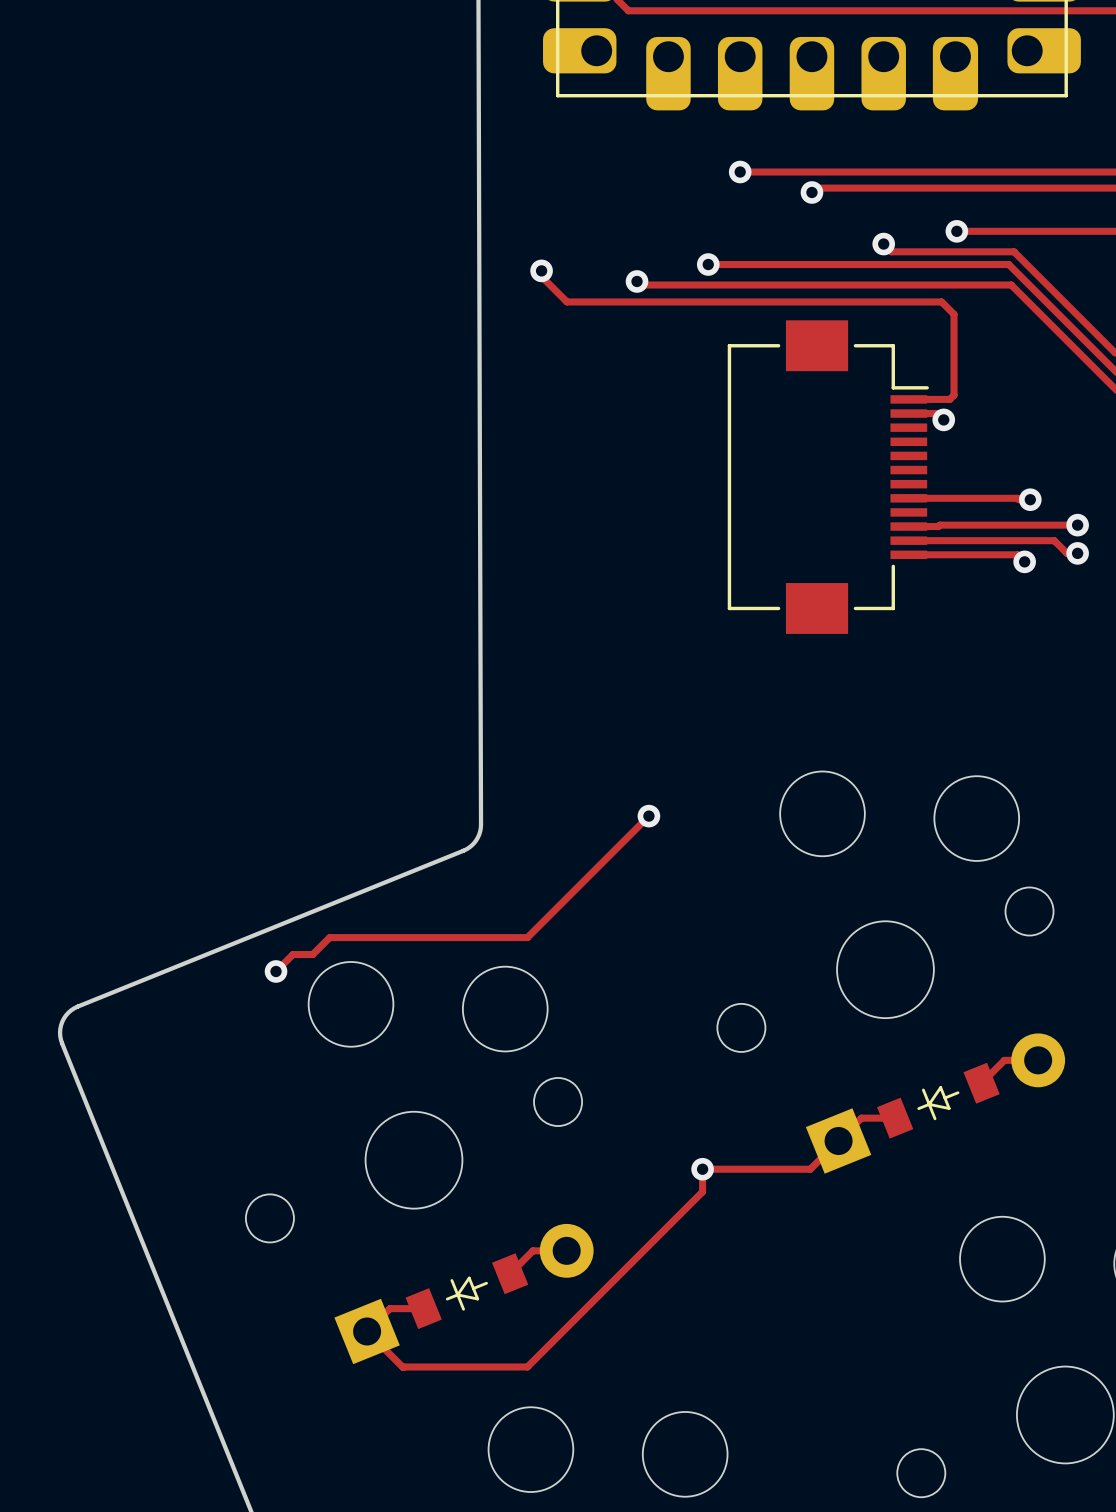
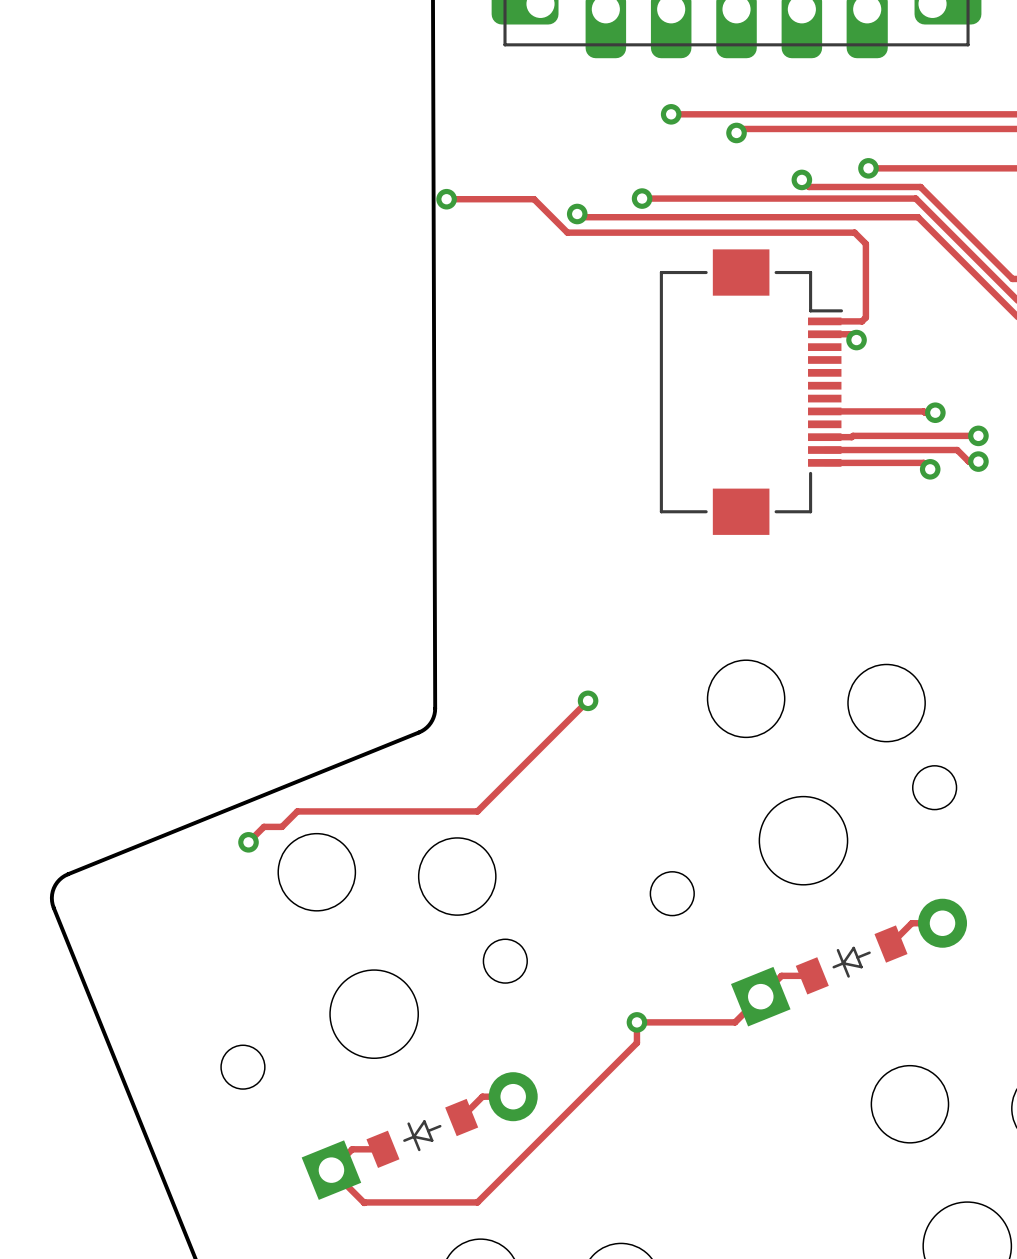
track: (541, 270) (541, 276) (567, 301) (626, 301) -> (446, 199) (534, 199) (567, 232)
via position: (541, 270) -> (446, 199)

